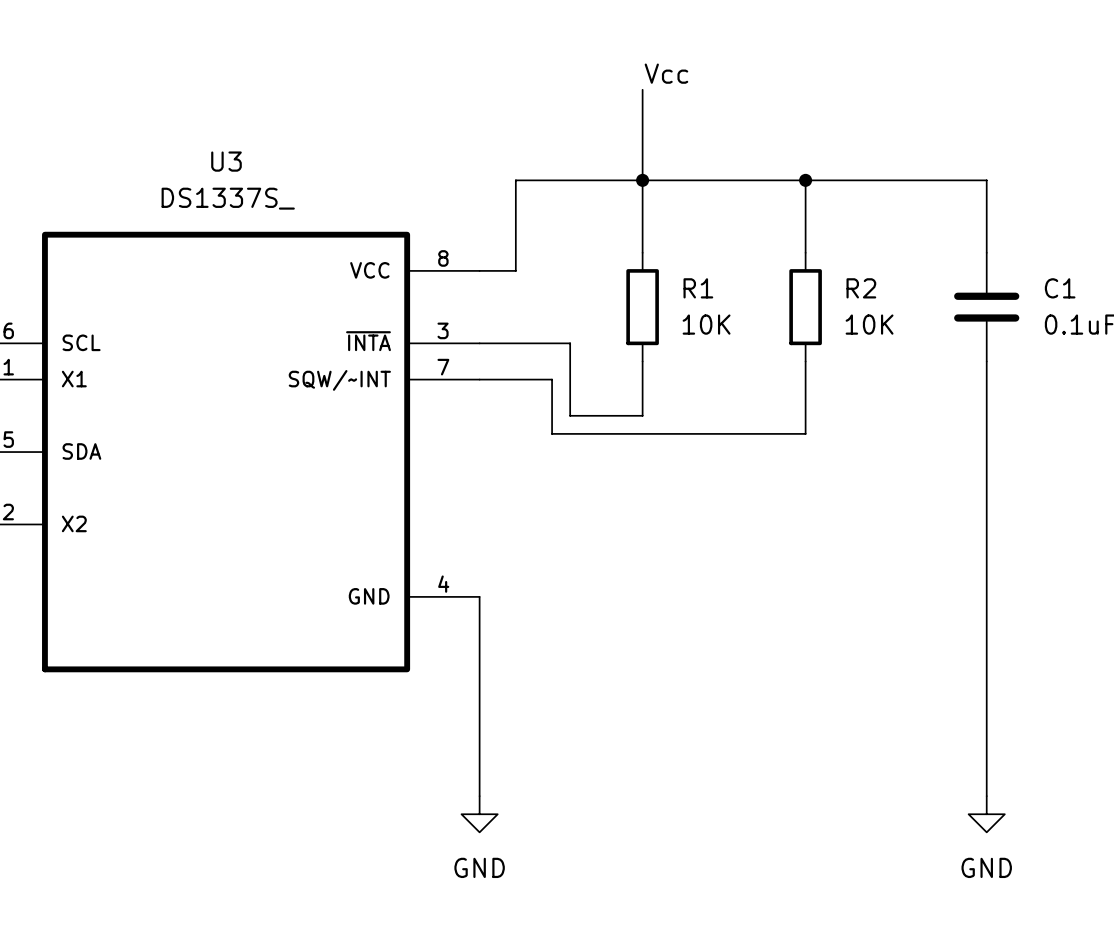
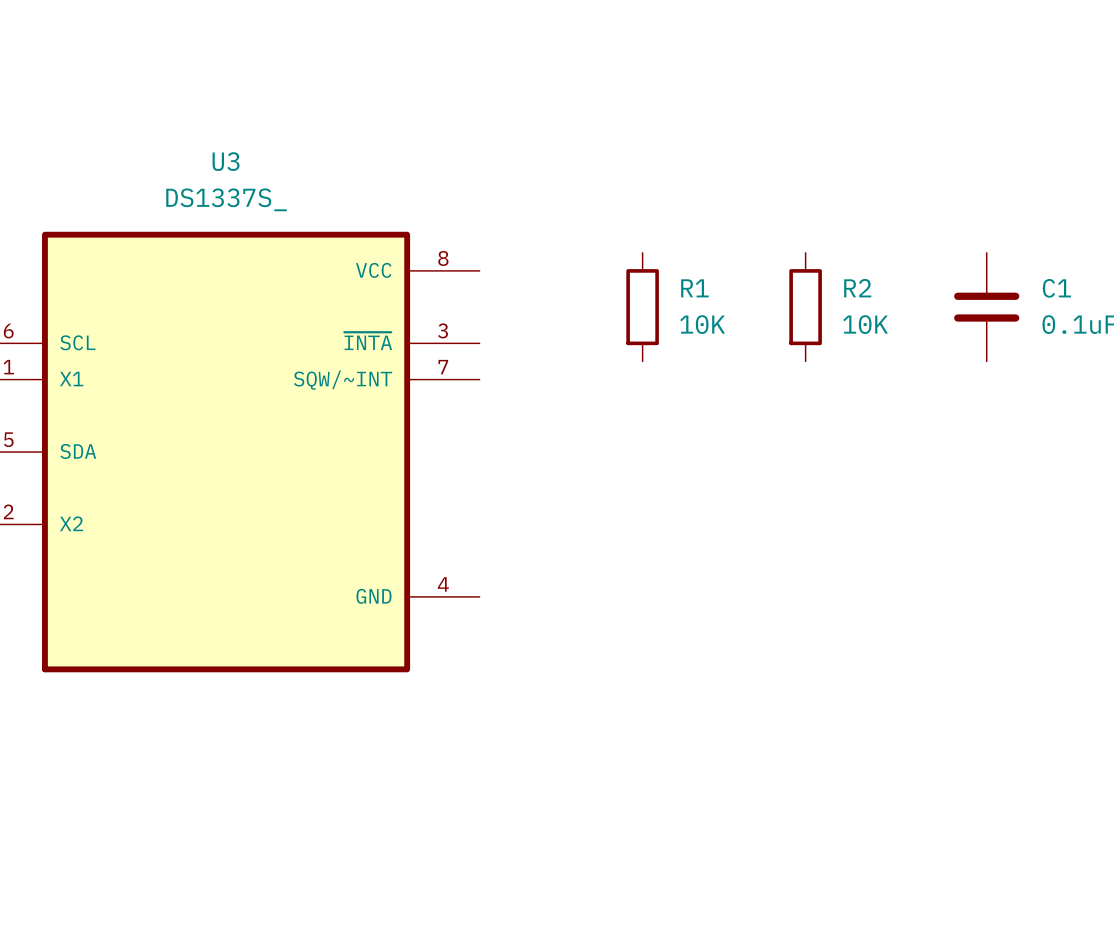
label: Vcc (666, 73) -> none
wire: (642, 89) (642, 252) -> none
junction: (642, 180) -> none
wire: (805, 180) (805, 252) -> none
junction: (805, 180) -> none
wire: (986, 252) (986, 180) (515, 180) (515, 270) (479, 270) -> none
wire: (479, 343) (570, 343) (570, 415) (642, 415) (642, 361) -> none
wire: (805, 361) (805, 433) (552, 433) (552, 379) (479, 379) -> none
wire: (986, 361) (986, 796) -> none
wire: (479, 596) (479, 796) -> none
power symbol: GND (479, 814) -> none
power symbol: GND (986, 814) -> none

